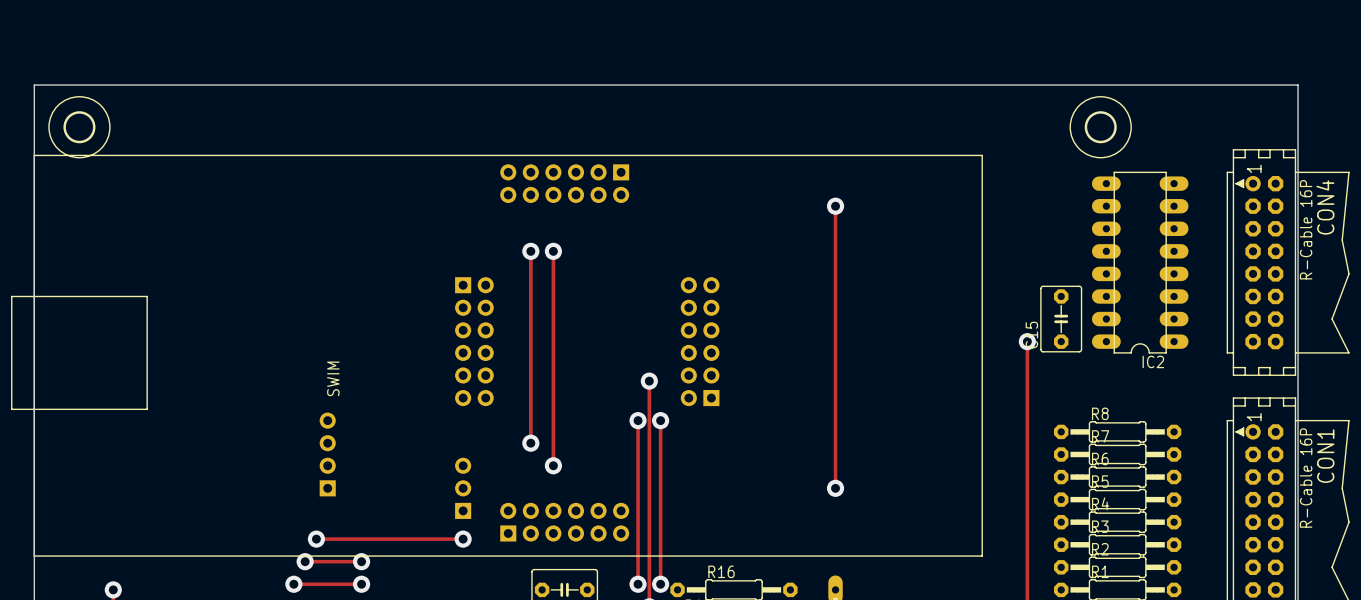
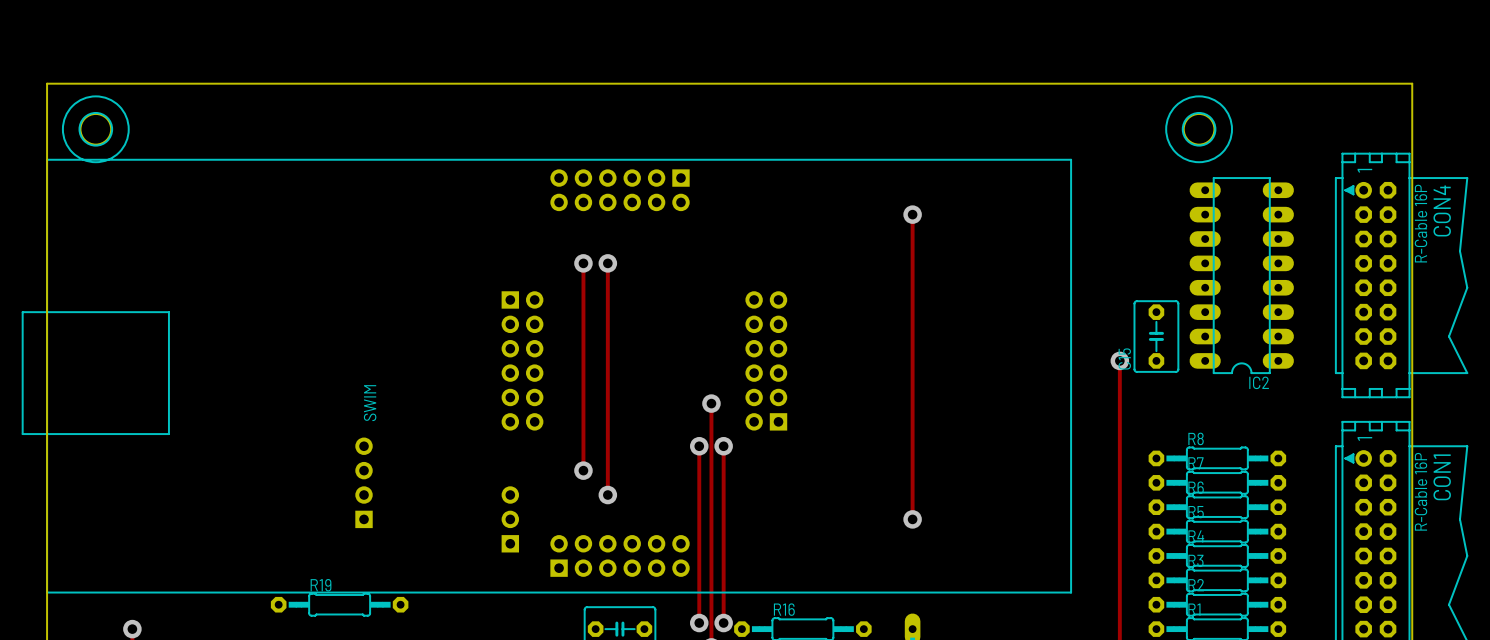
track: (316, 539) (463, 539) -> none
via: (316, 539) -> none
via: (463, 539) -> none
track: (305, 561) (361, 561) -> none
via: (305, 561) -> none
via: (361, 561) -> none
R19: none -> (339, 604)
track: (293, 584) (361, 584) -> none
via: (293, 584) -> none
via: (361, 584) -> none

